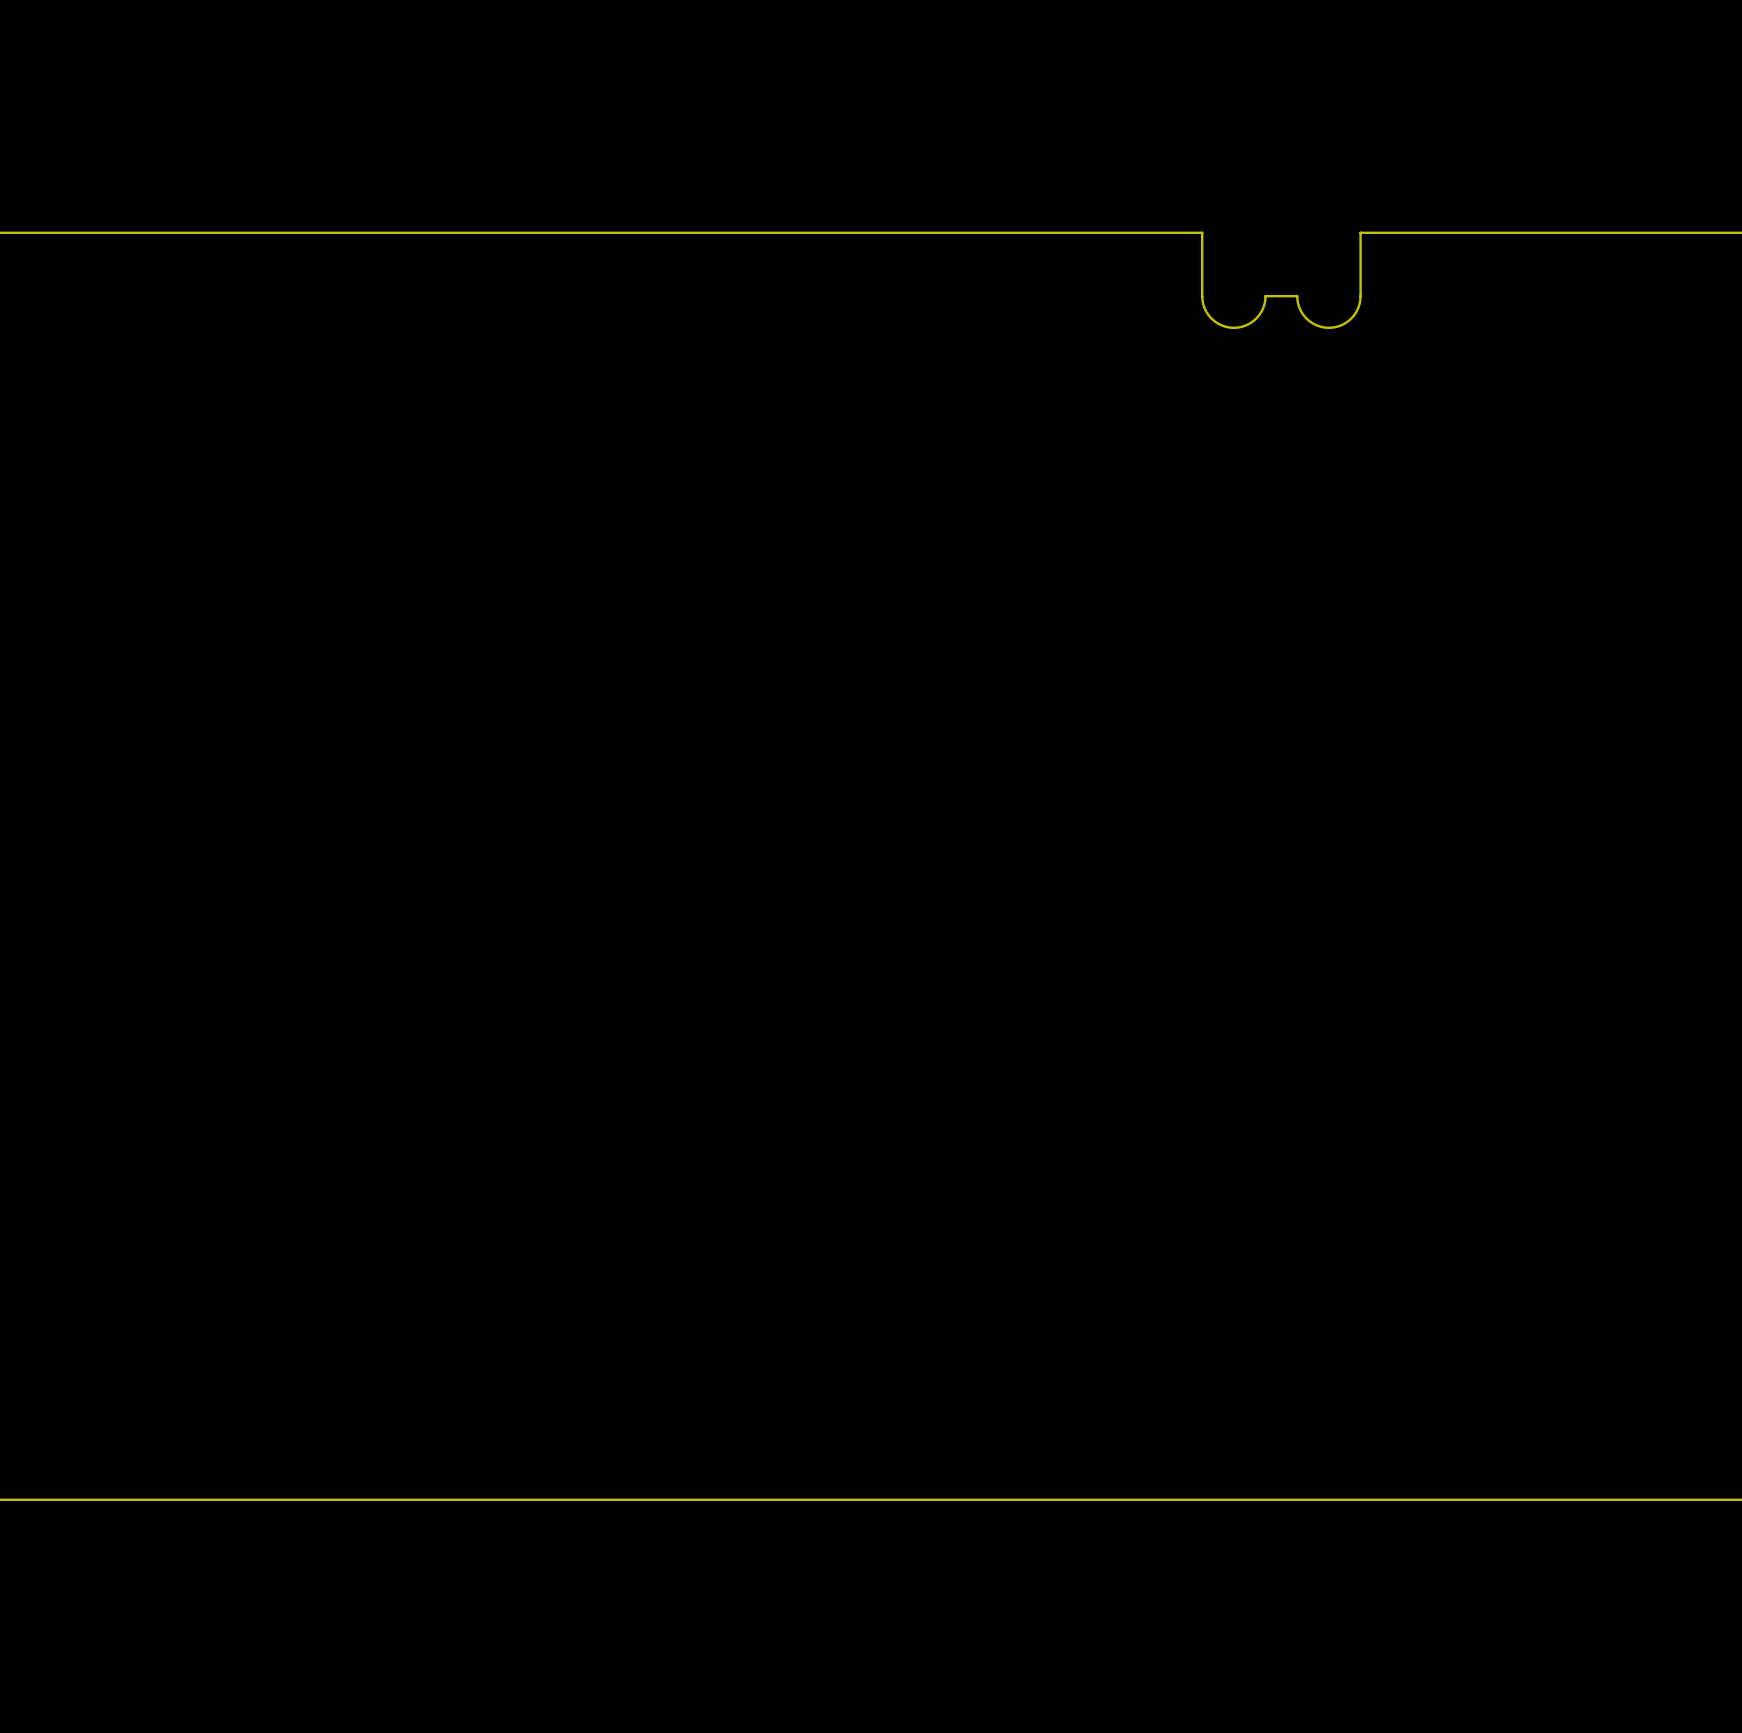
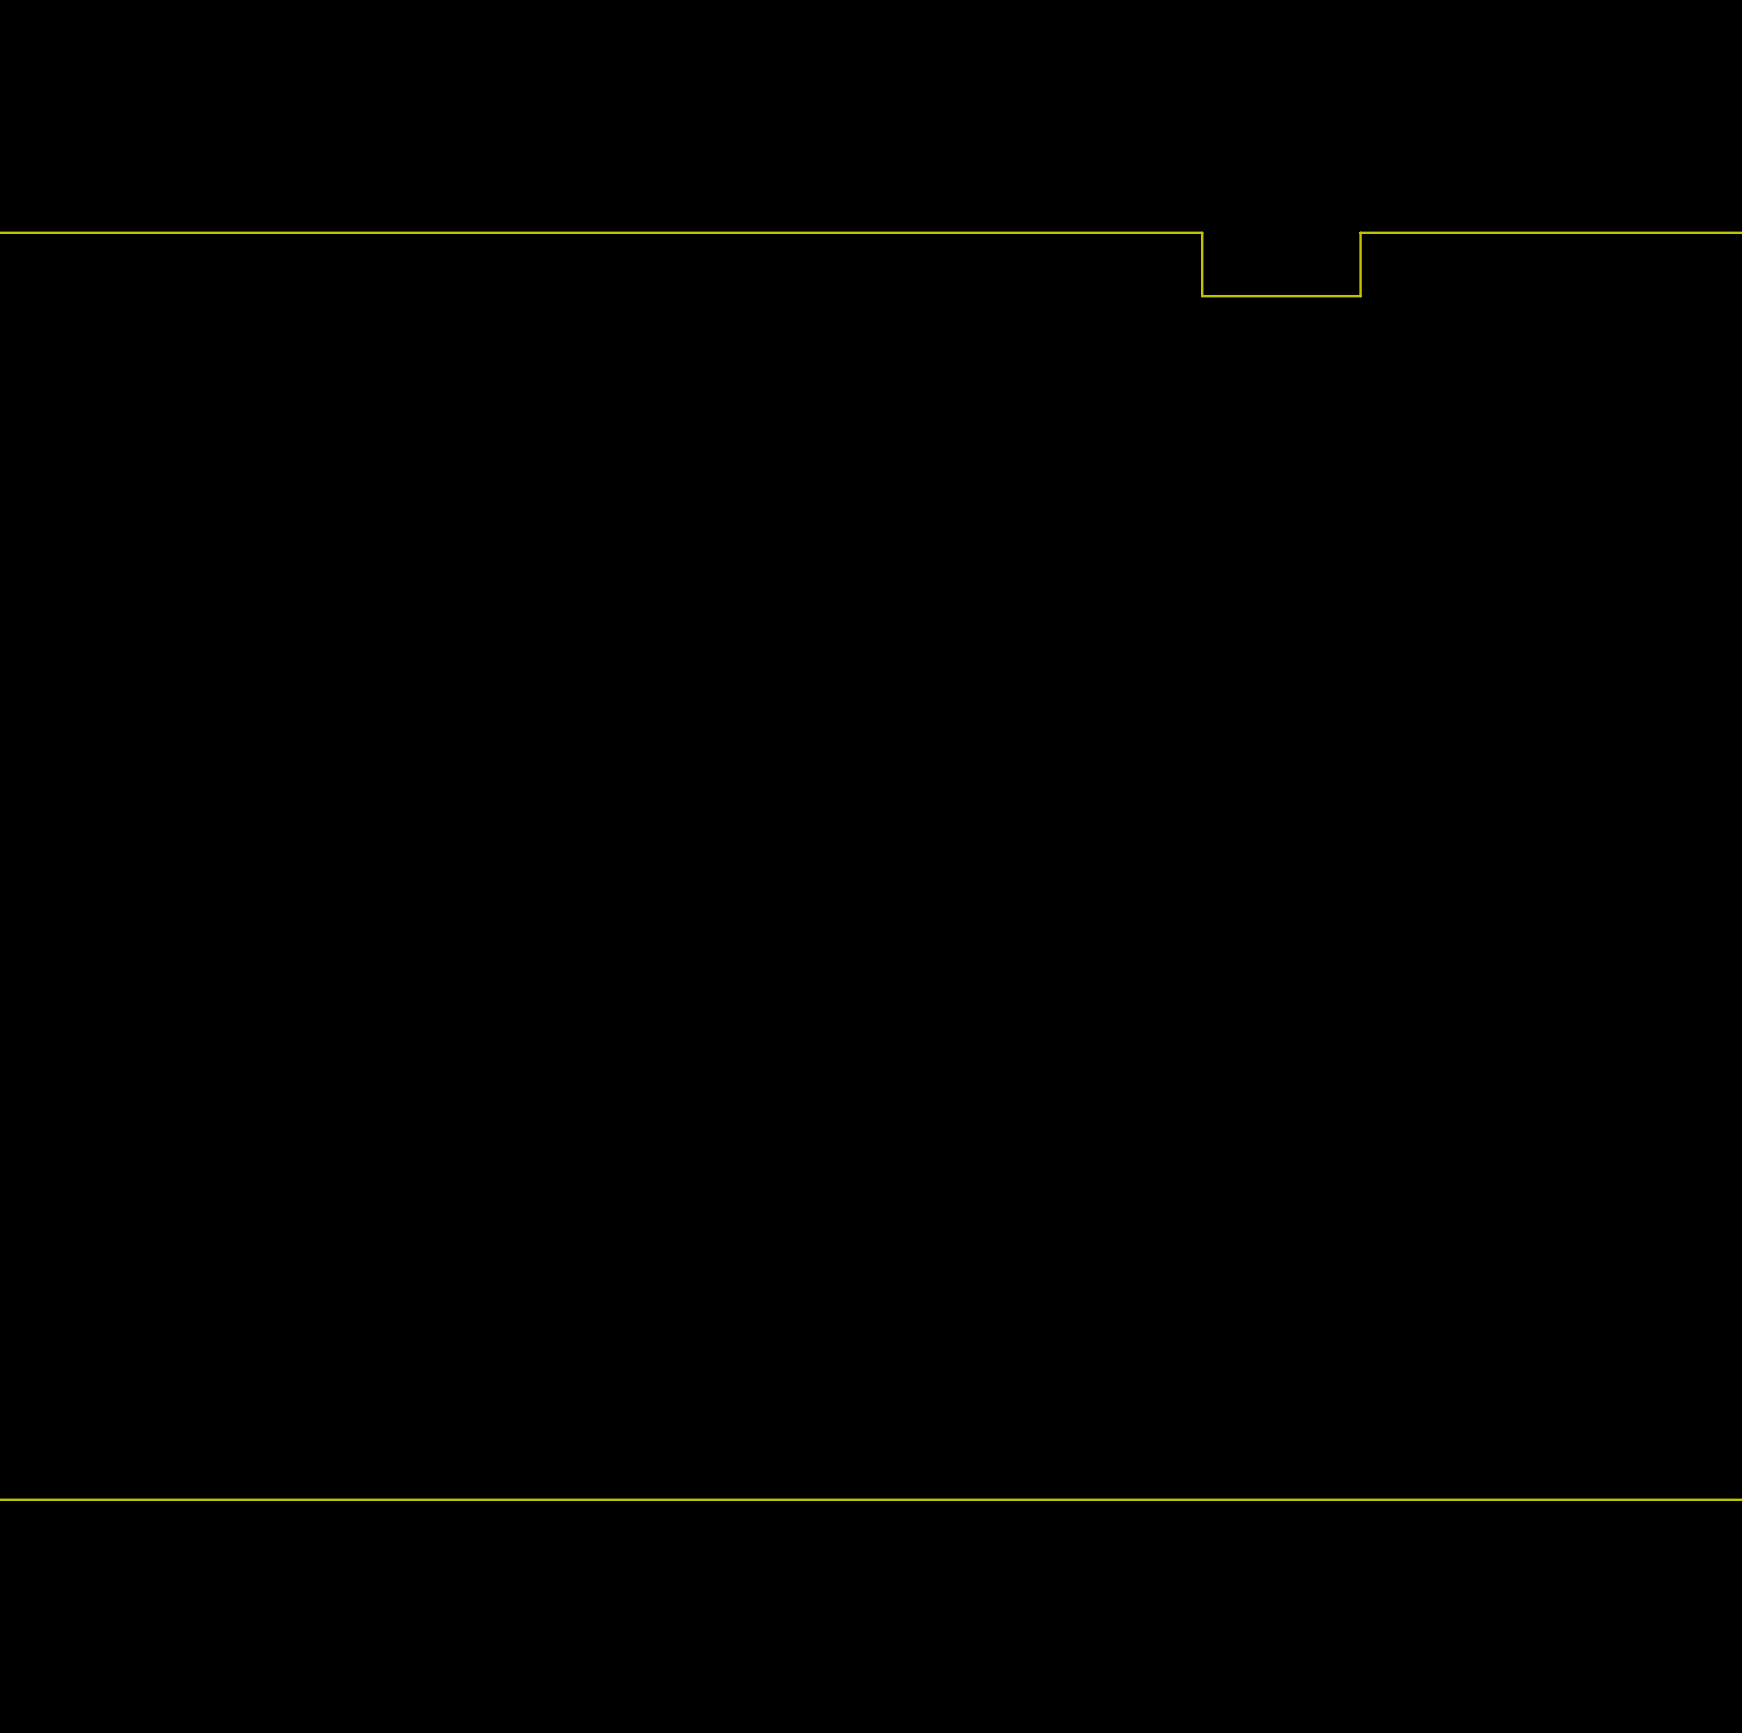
board edge: (1202, 296) (1204, 308) (1211, 318) (1221, 325) (1233, 327) (1245, 325) (1256, 318) (1263, 308) (1265, 296) -> (1202, 296) (1265, 296)
board edge: (1297, 296) (1299, 308) (1306, 318) (1316, 325) (1328, 327) (1341, 325) (1351, 318) (1358, 308) (1360, 296) -> (1297, 296) (1360, 296)

